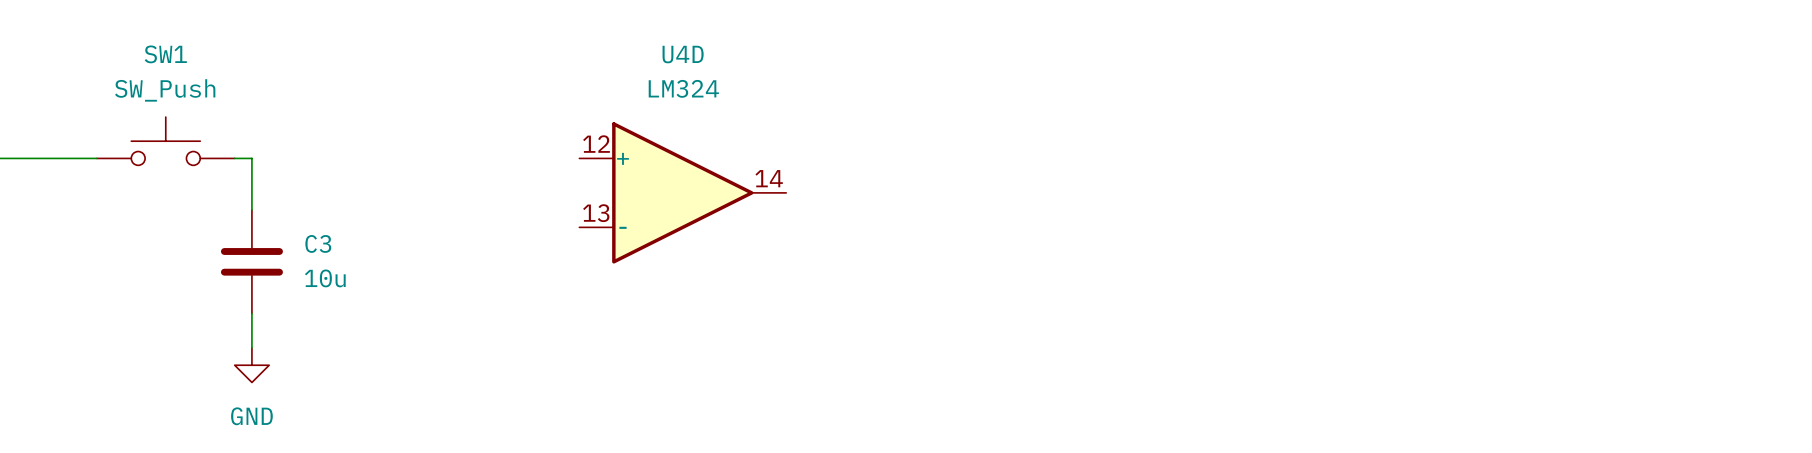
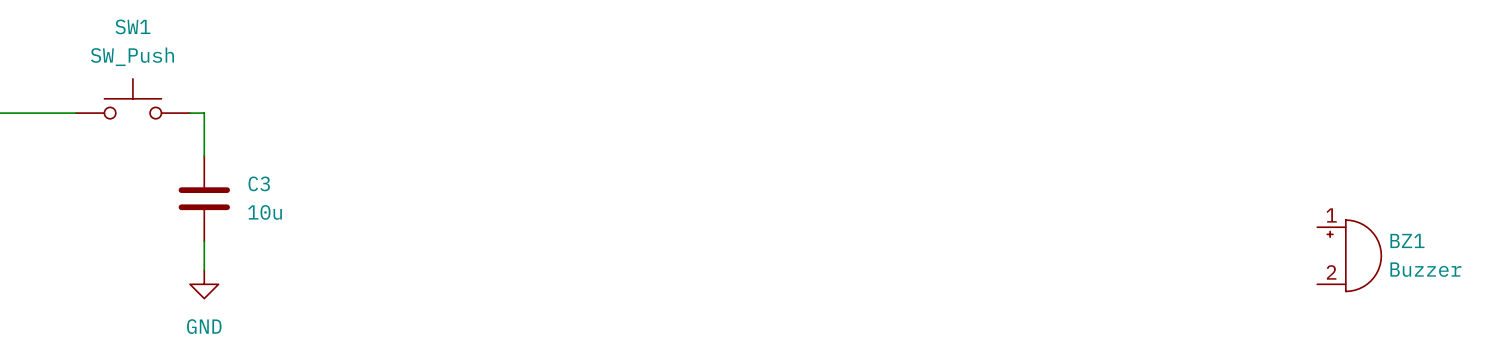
U4D: LM324 (682, 192) -> none
BZ1: none -> Buzzer (1349, 255)

